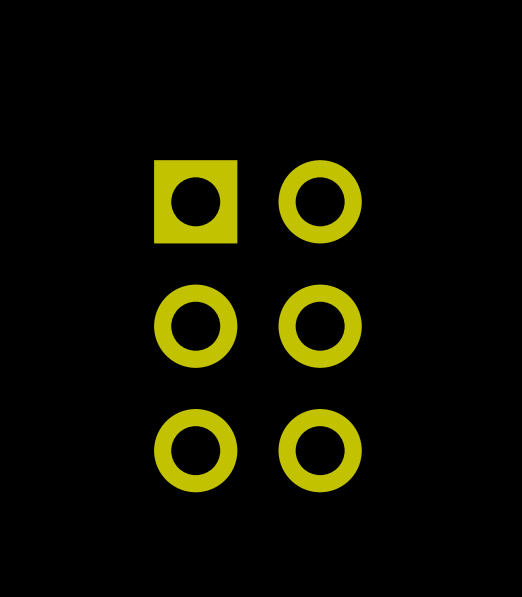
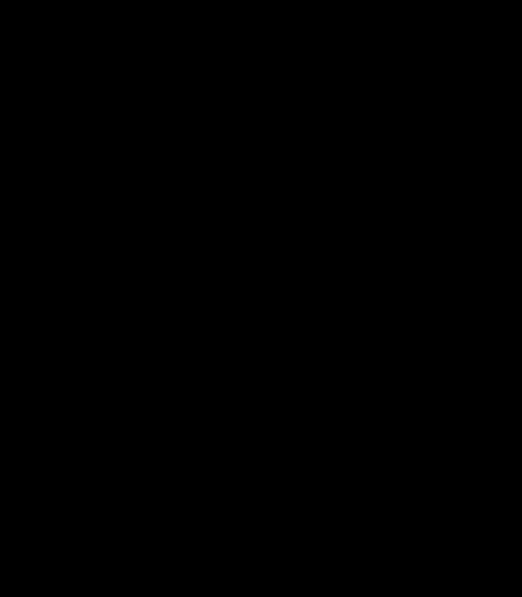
part: (257, 326) -> none

